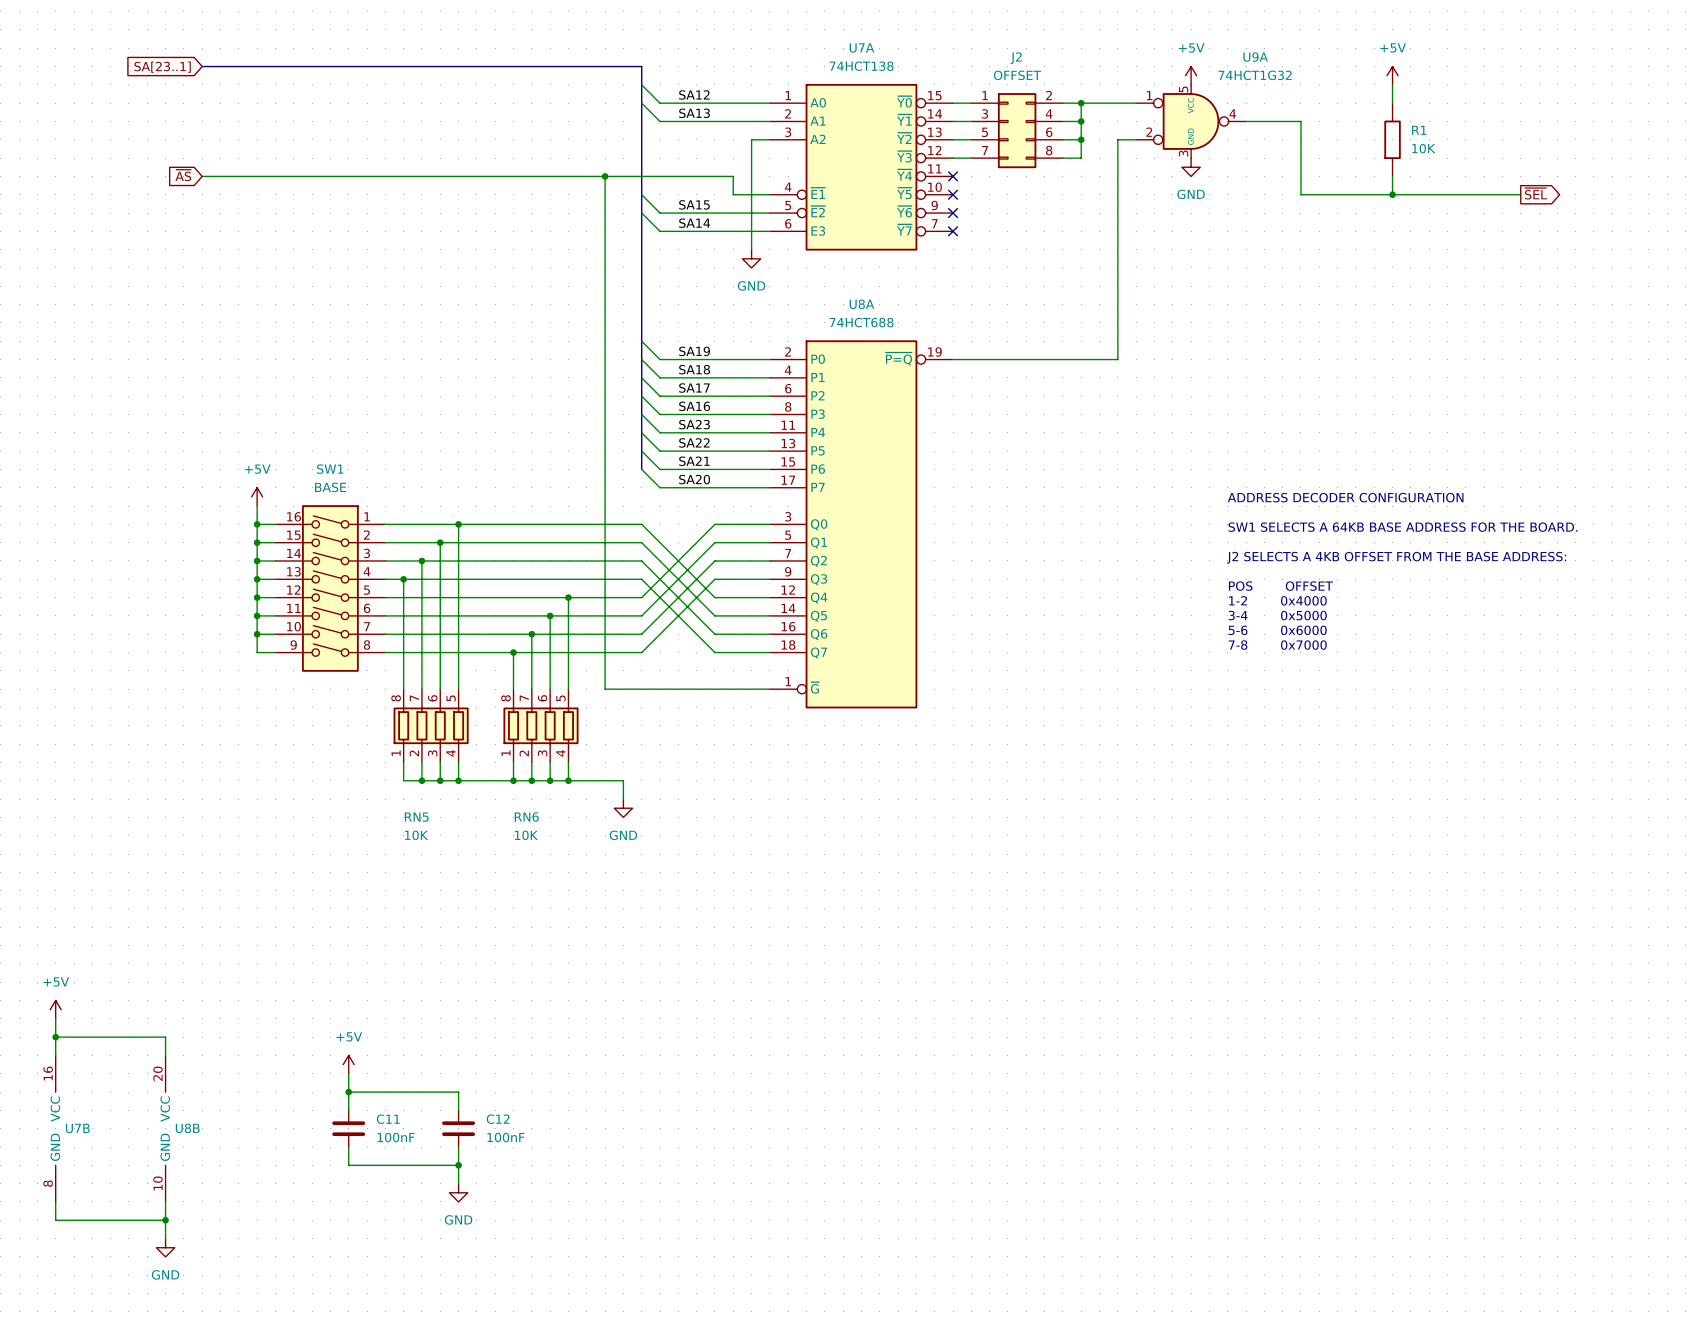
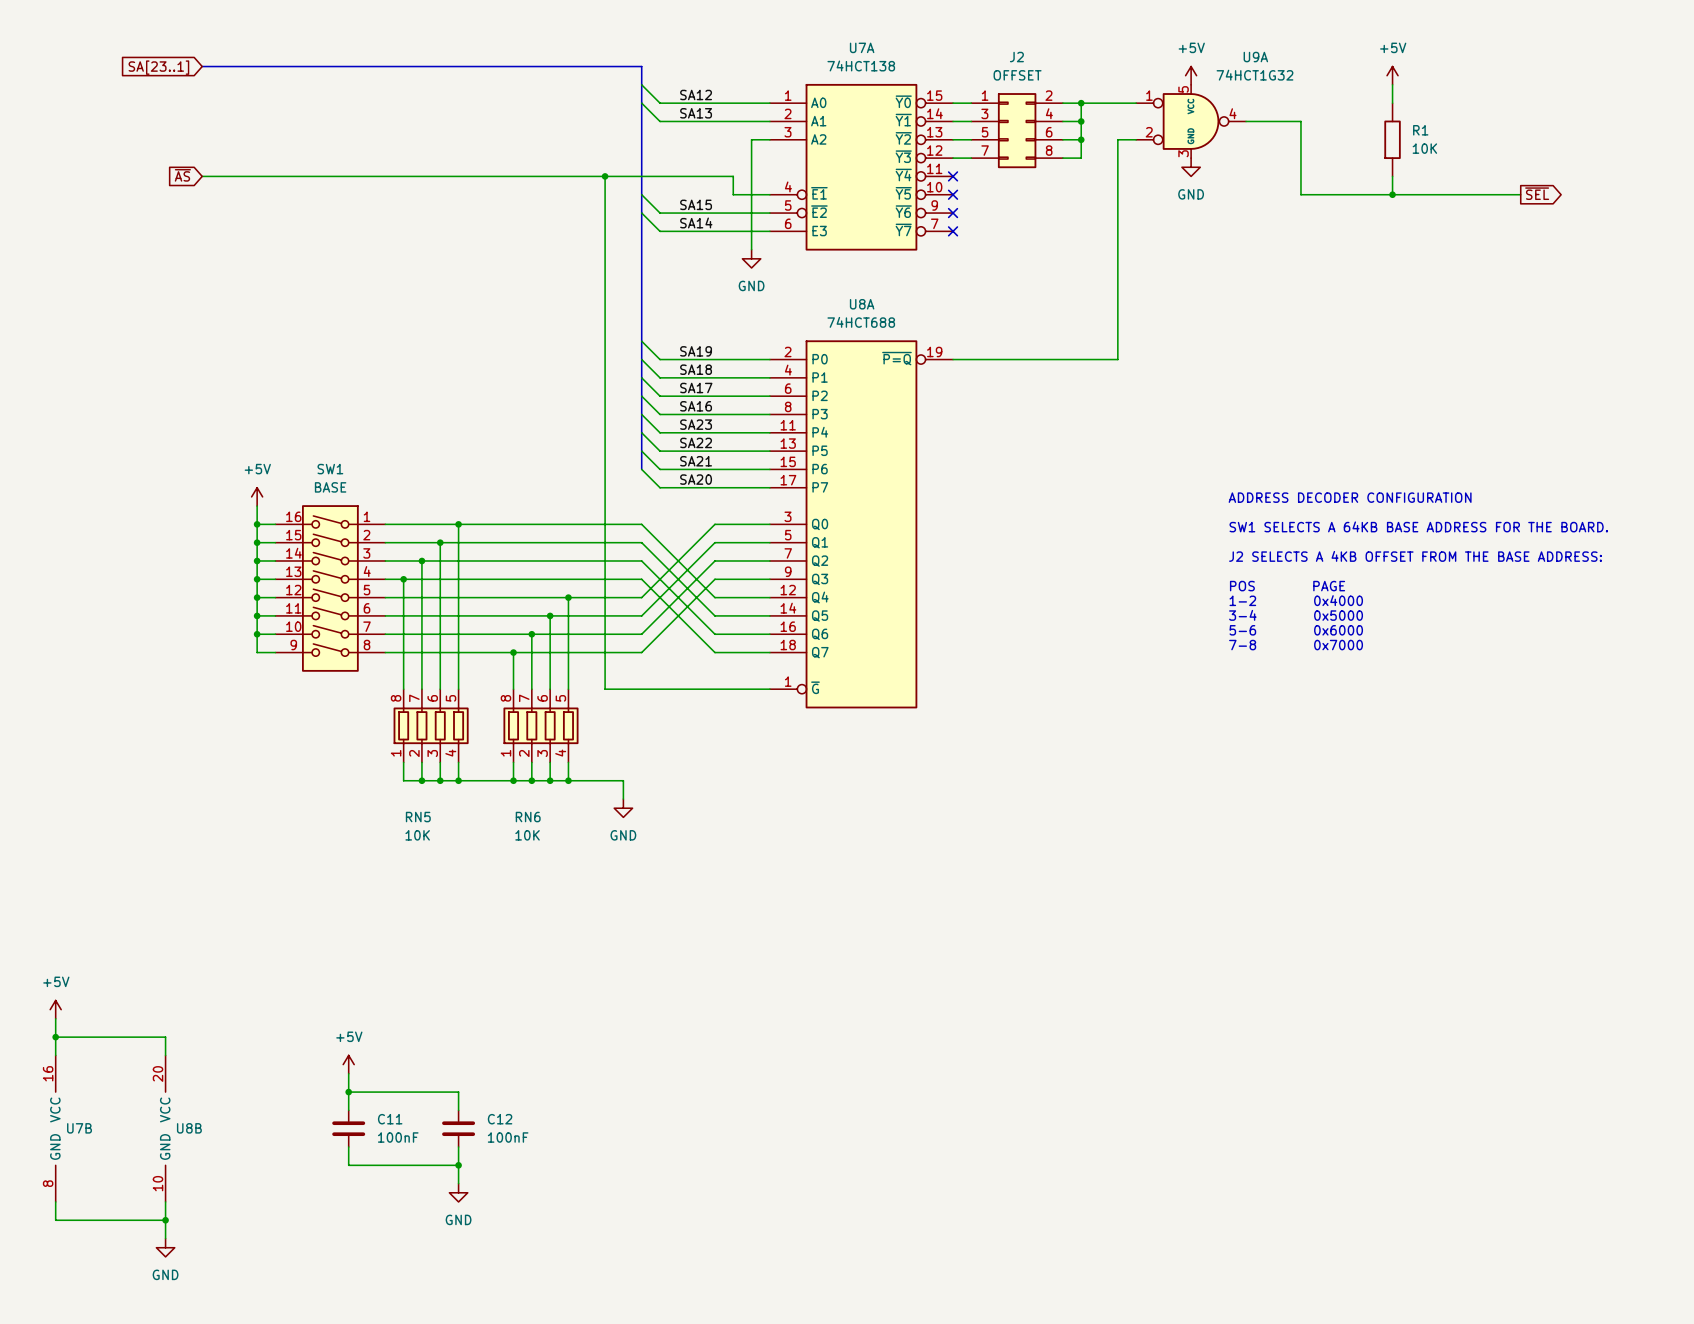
text: POS OFFSET (1281, 586) -> POS PAGE (1287, 586)

